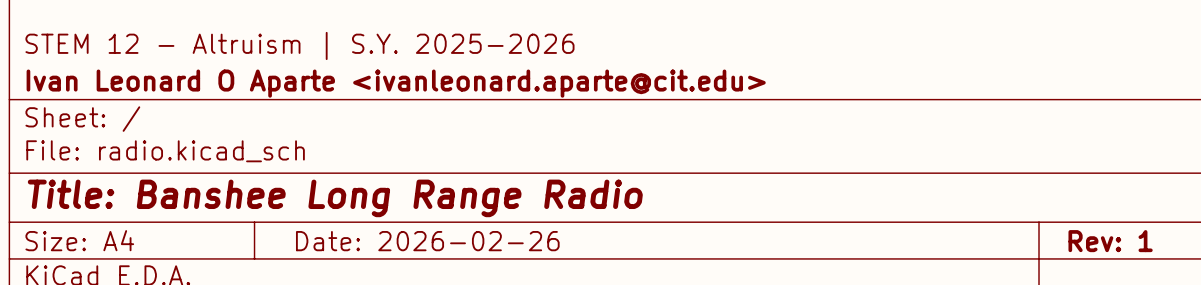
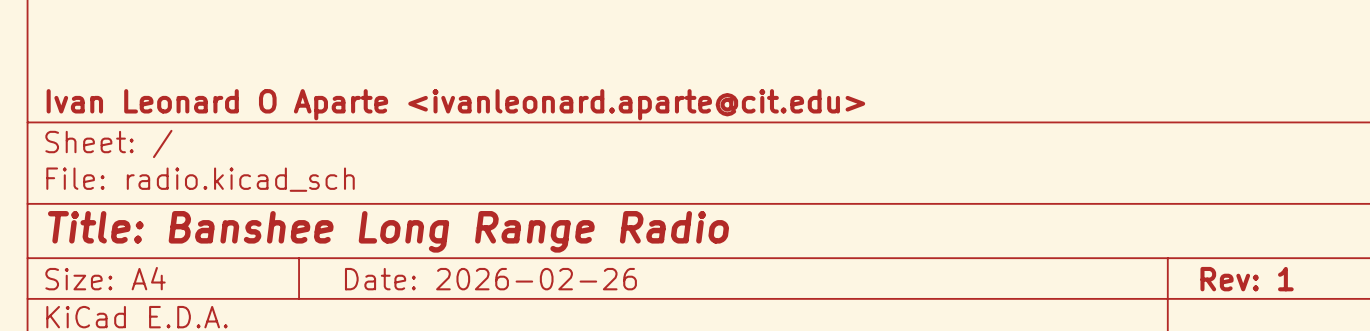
title block: STEM 12 - Altruism | S.Y. 2025-2026 (299, 45) -> none

